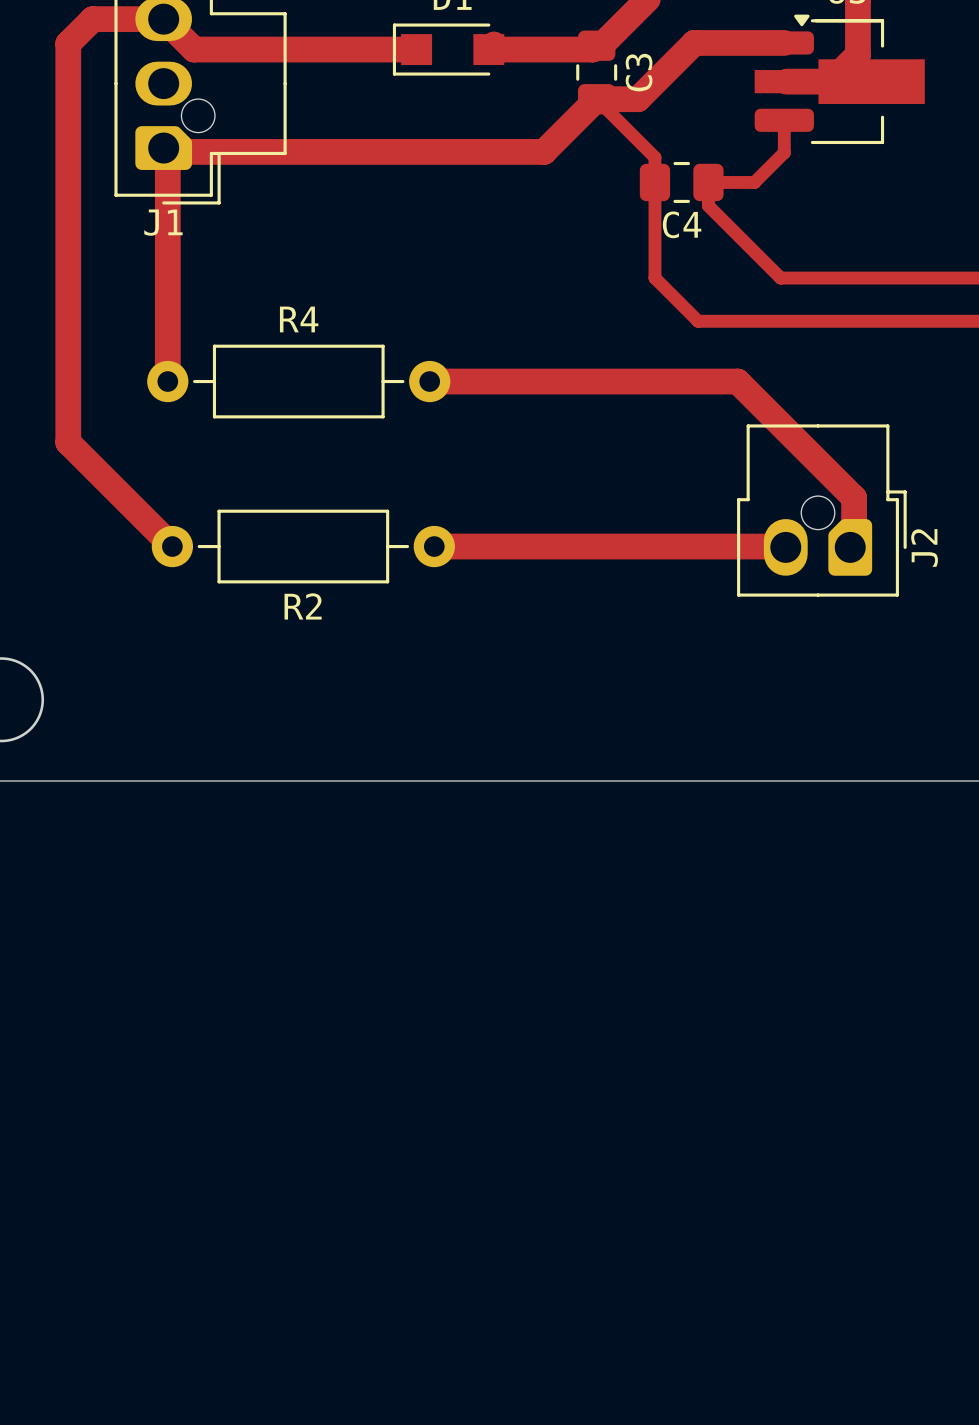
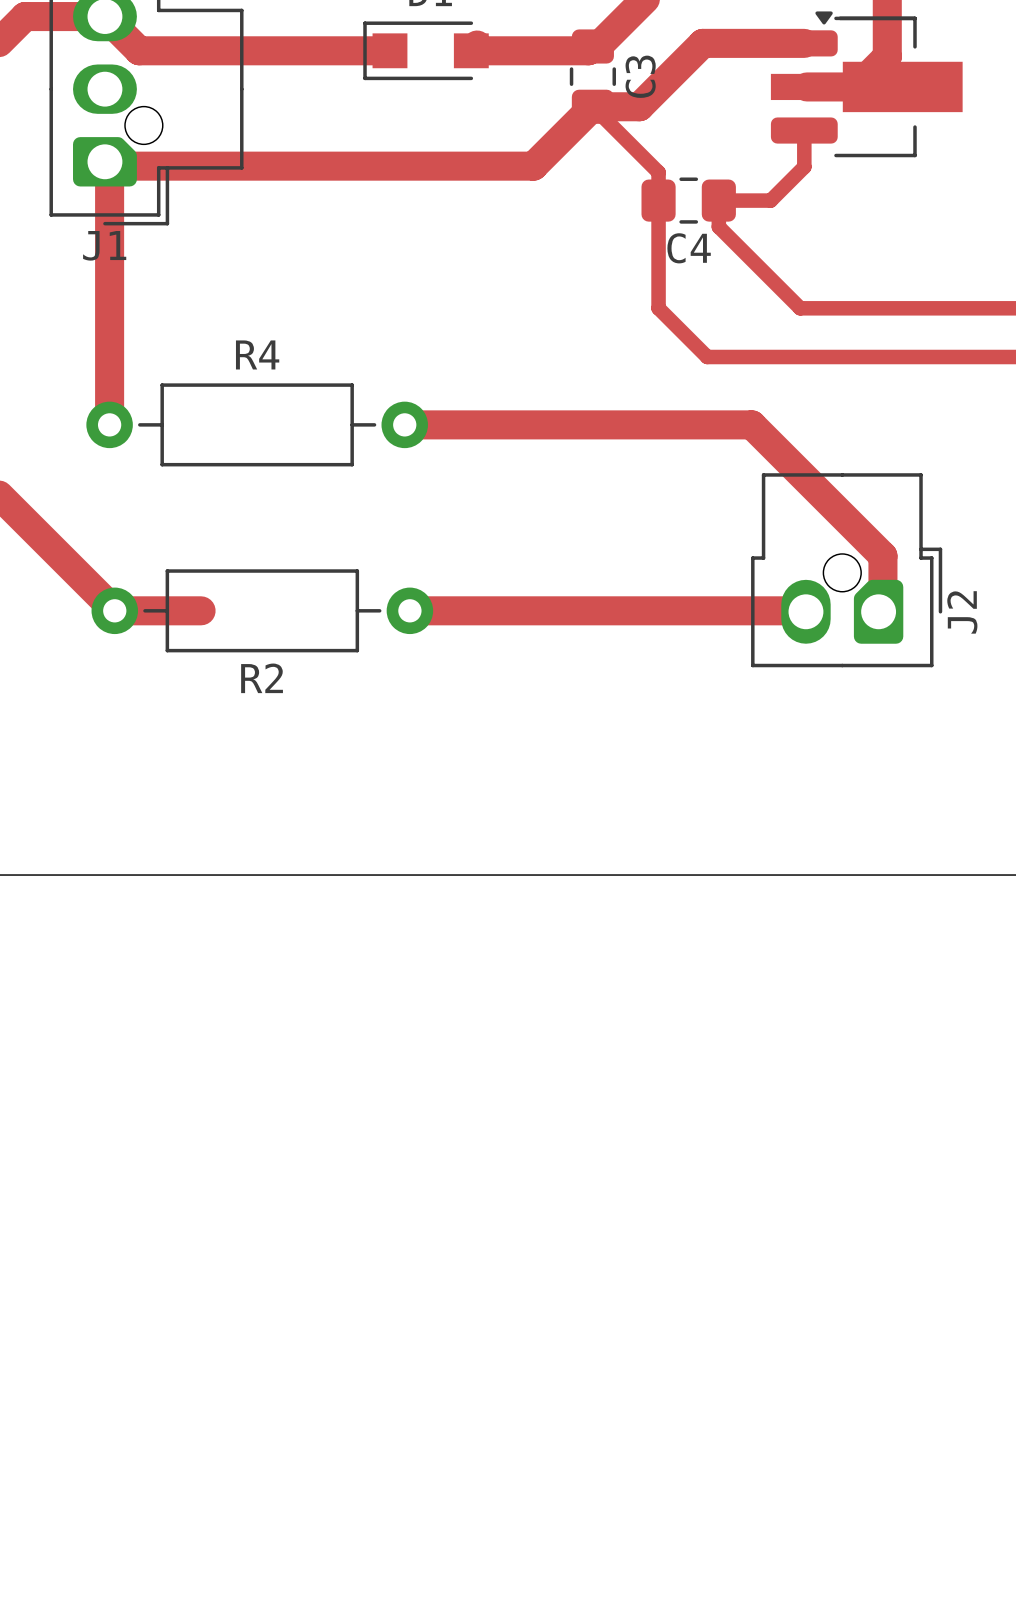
track: none -> (114, 610) (201, 610)

